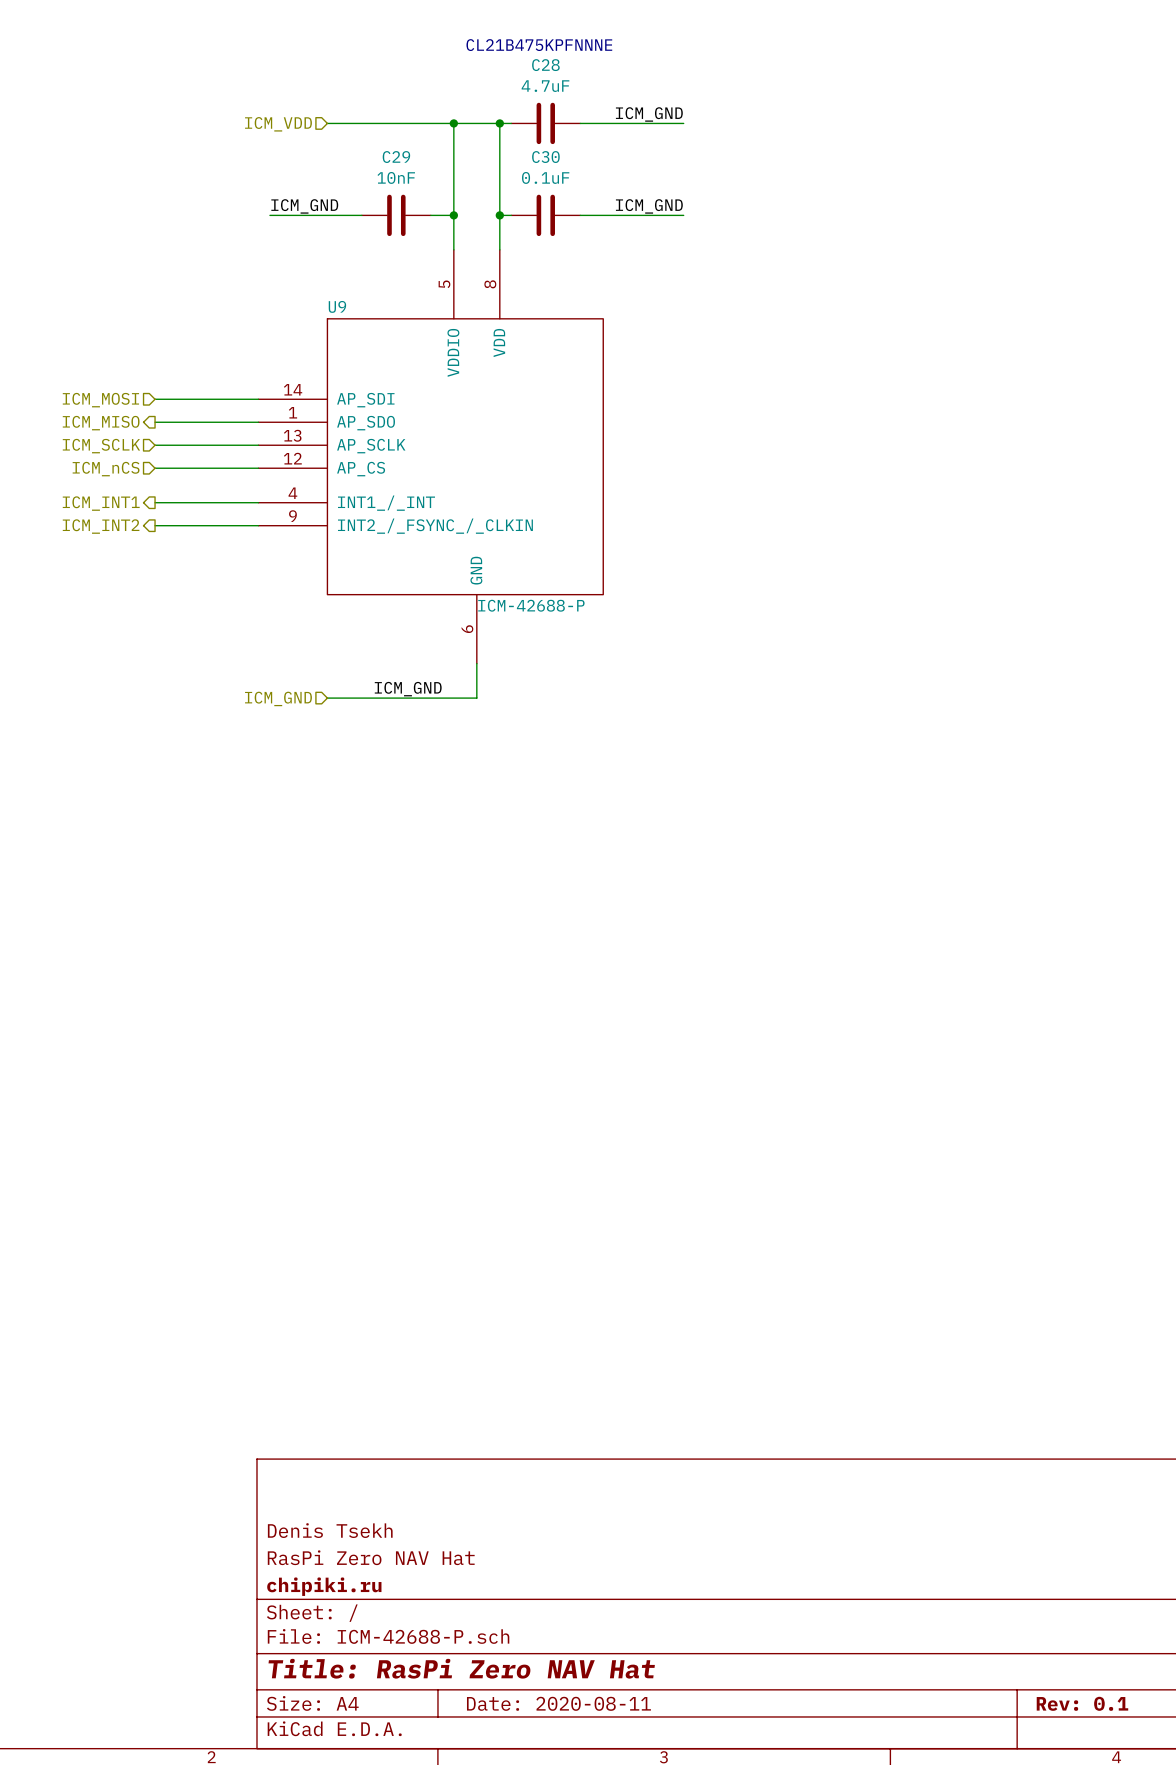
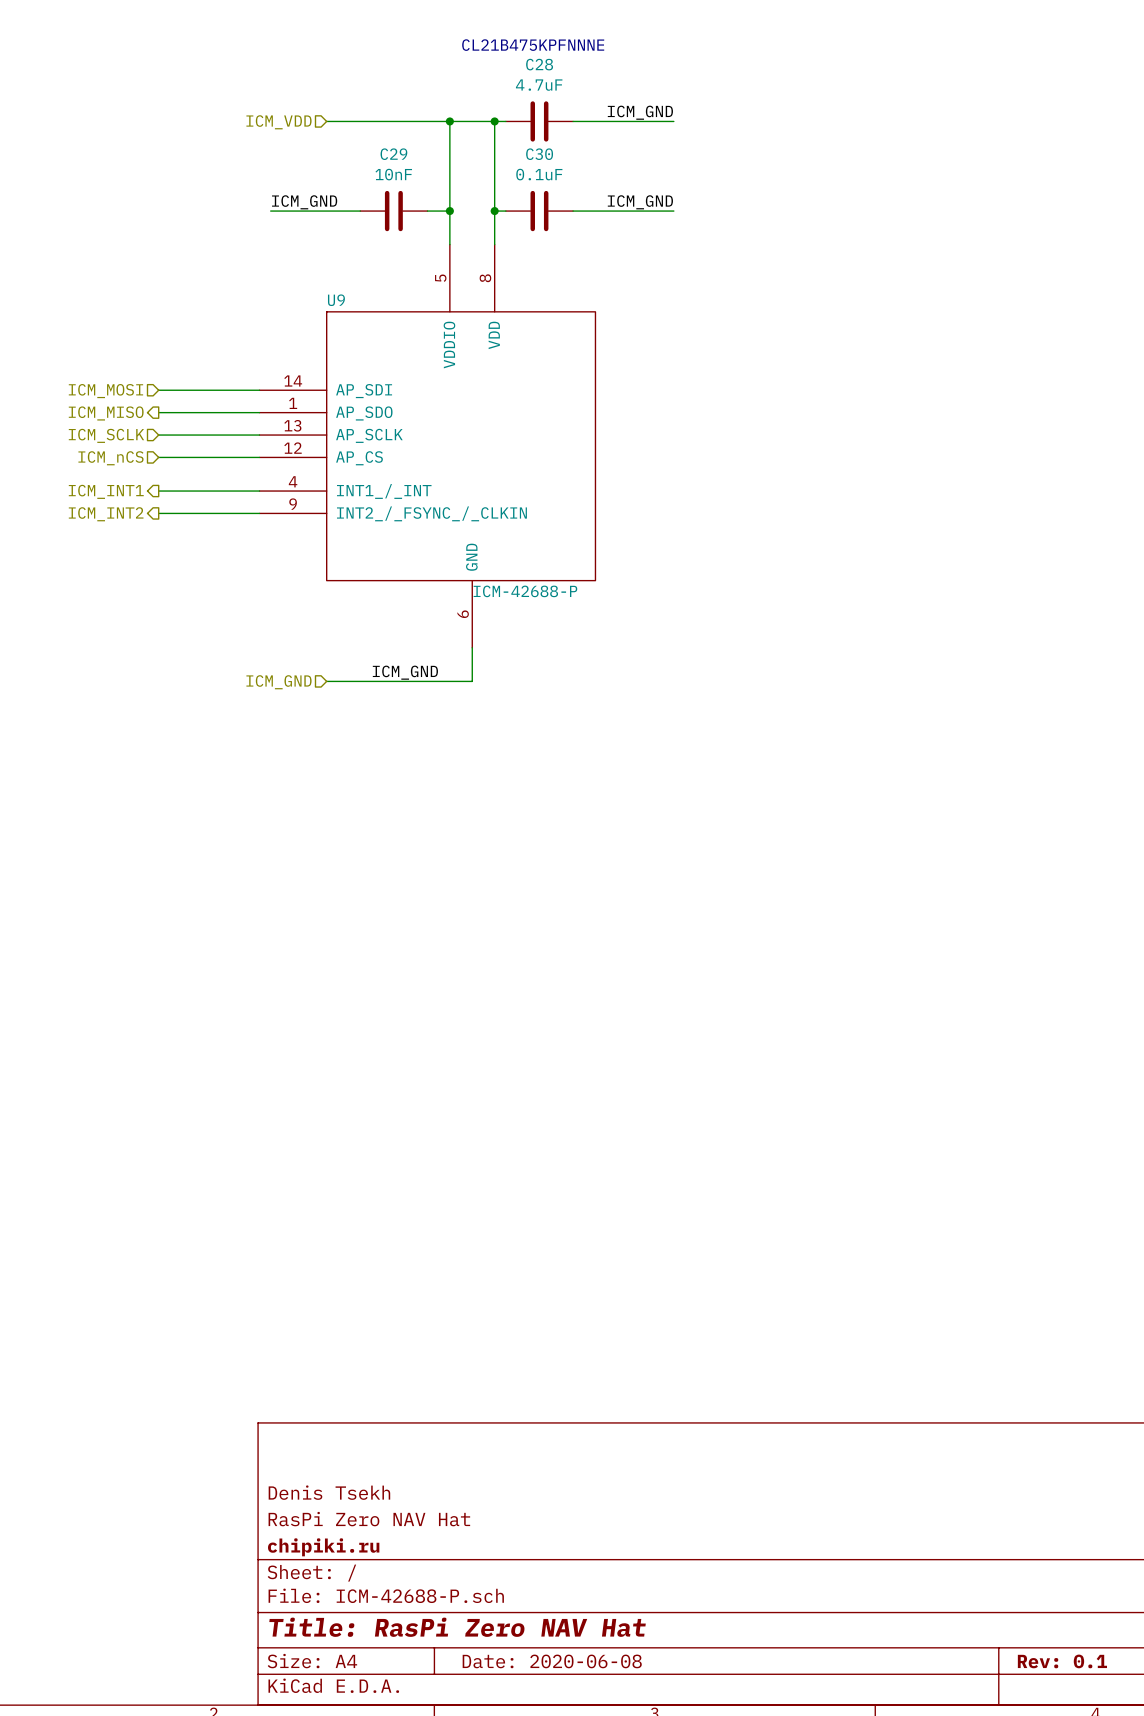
title block: Date: 2020-08-11 (558, 1703) -> Date: 2020-06-08 (552, 1661)

